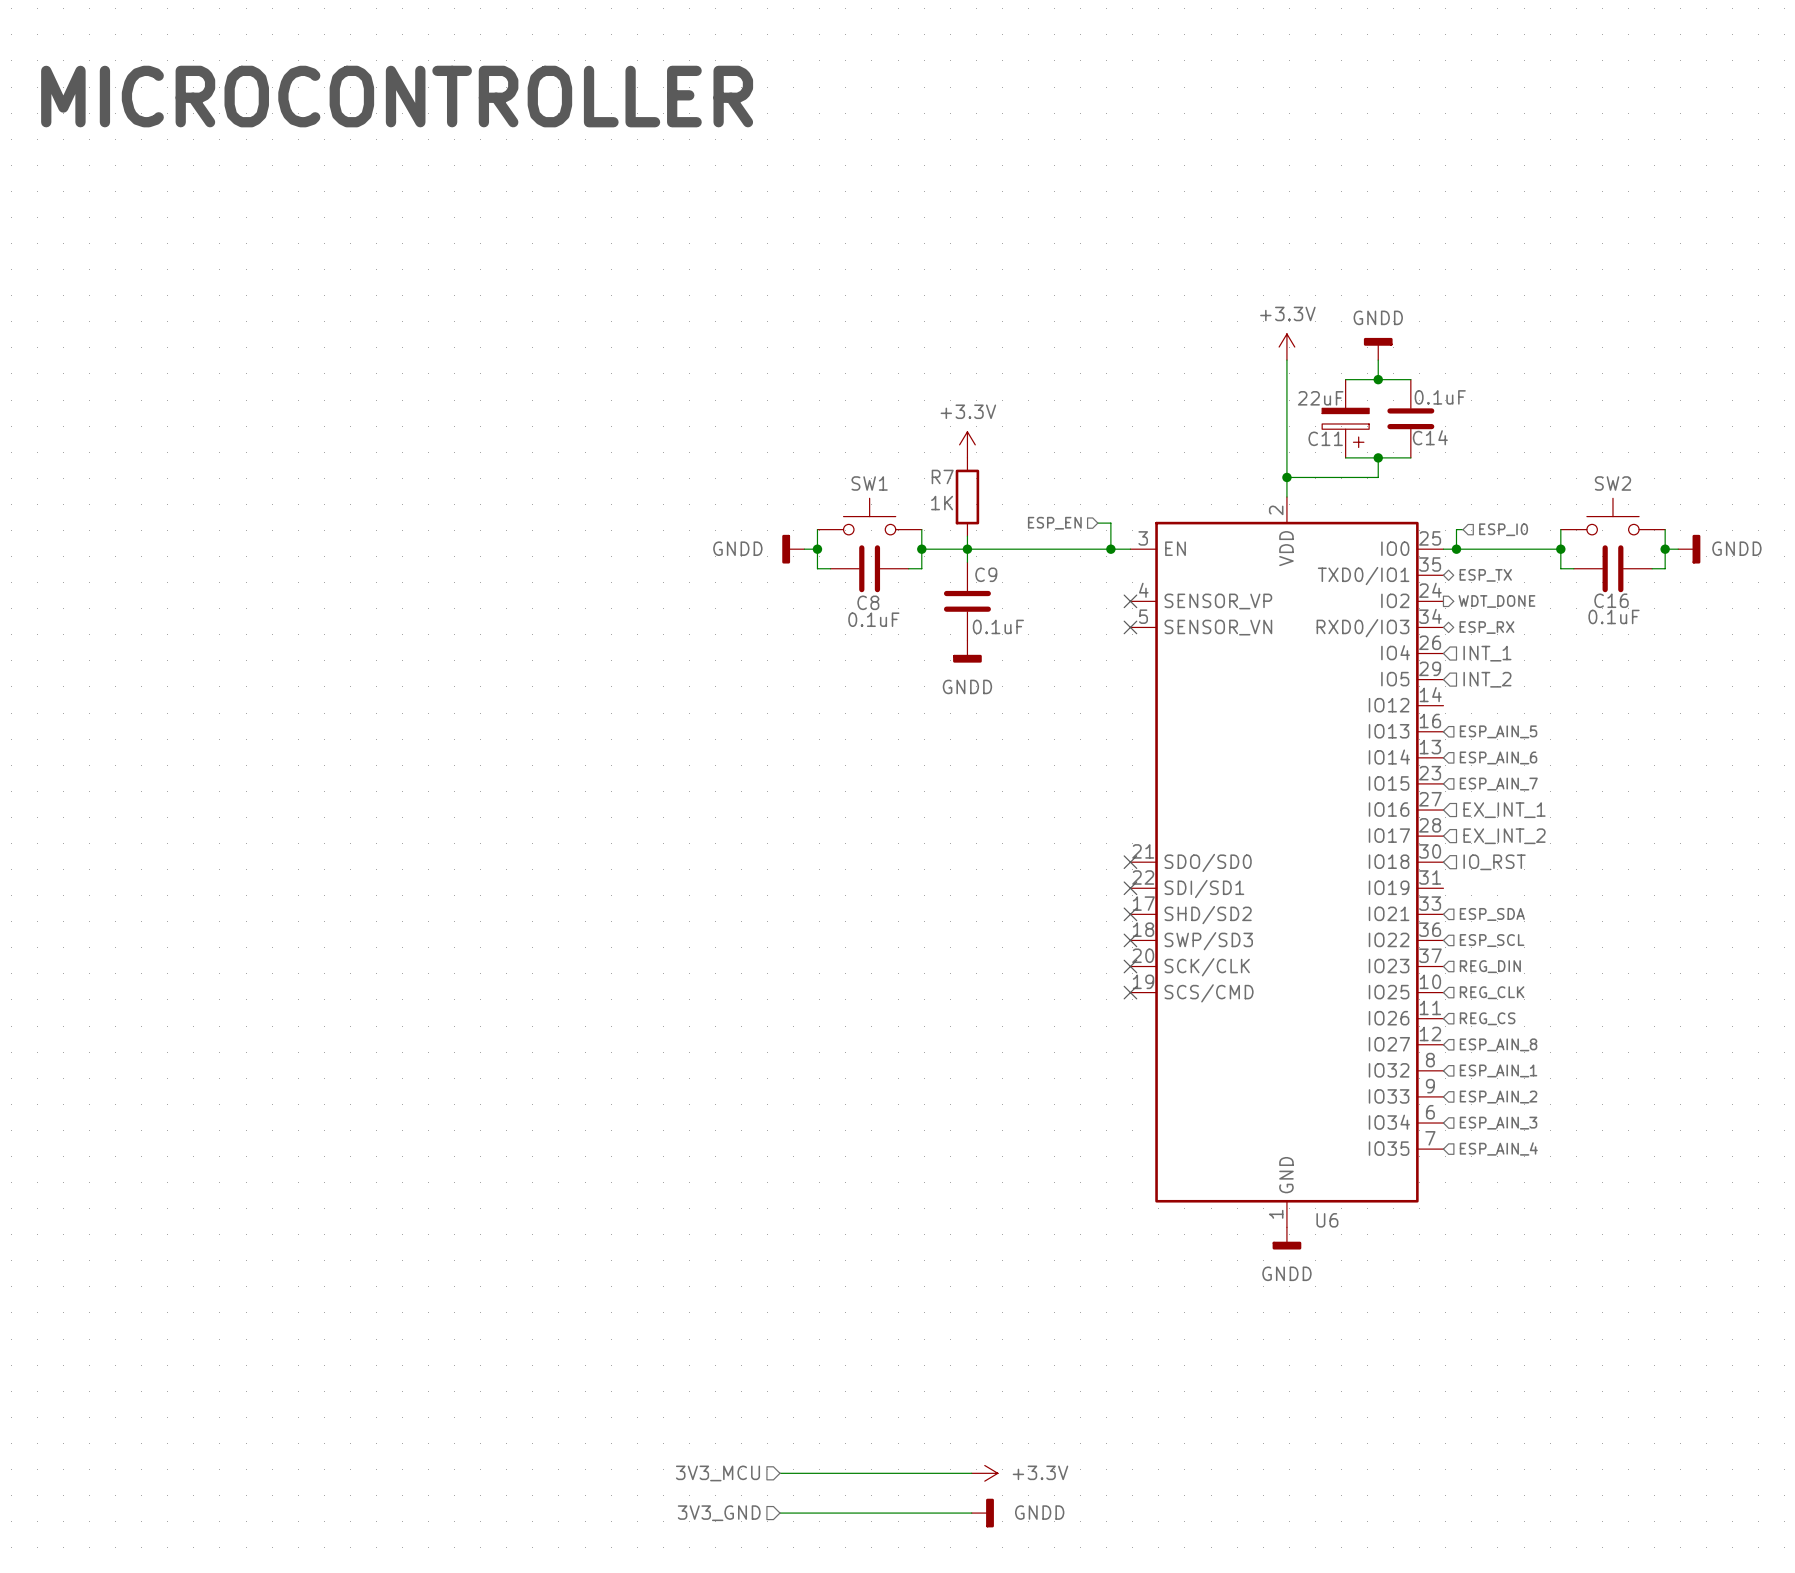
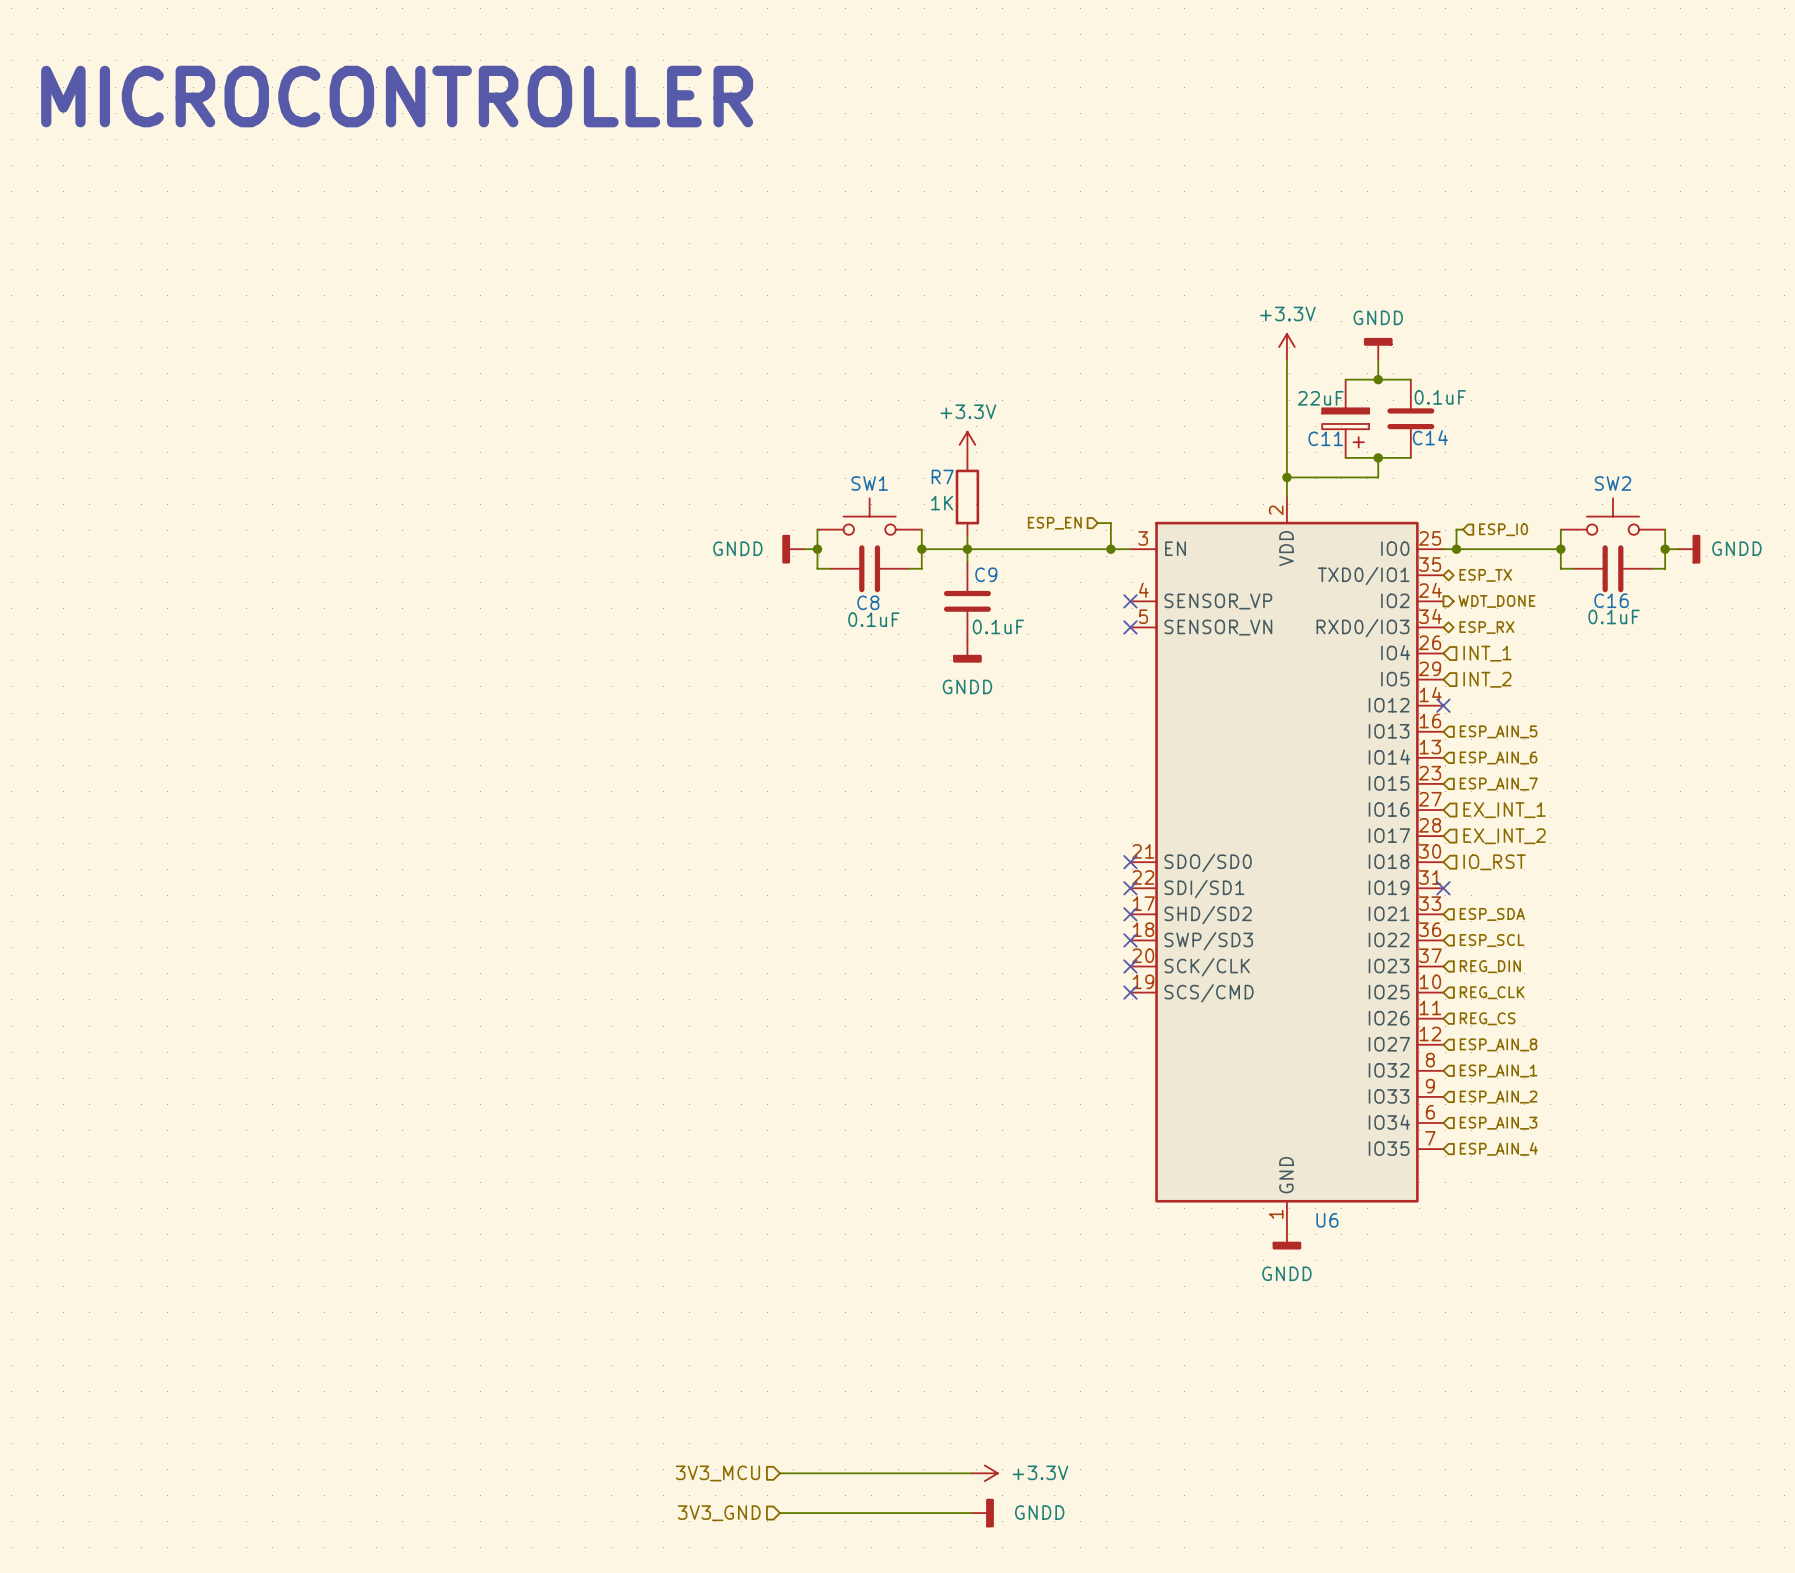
no-connect mark: none -> (1443, 705)
no-connect mark: none -> (1443, 888)

